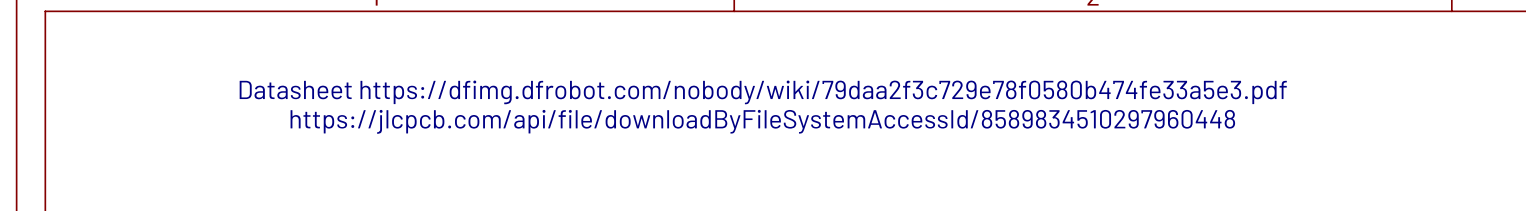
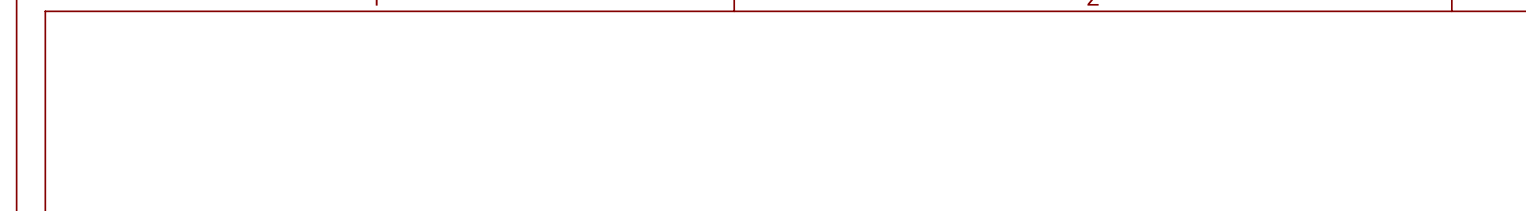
text: Datasheet https://dfimg.dfrobot.com/nobody/wiki/79daa2f3c729e78f0580b474fe33a5e3.pdf (763, 92) -> none
text: https://jlcpcb.com/api/file/downloadByFileSystemAccessId/8589834510297960448 (762, 121) -> none

